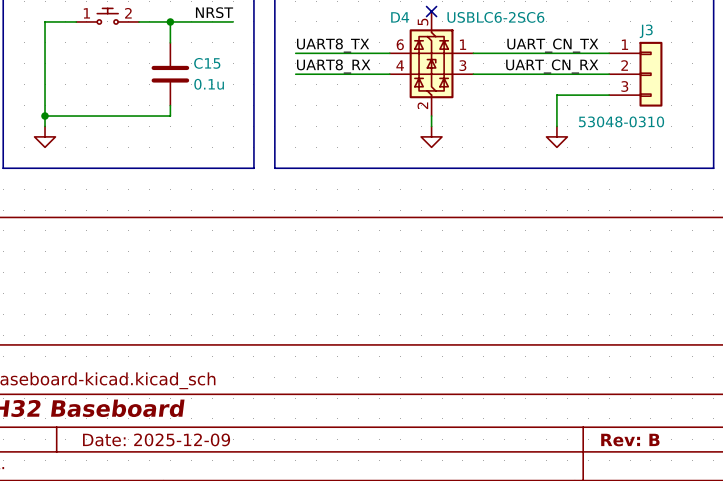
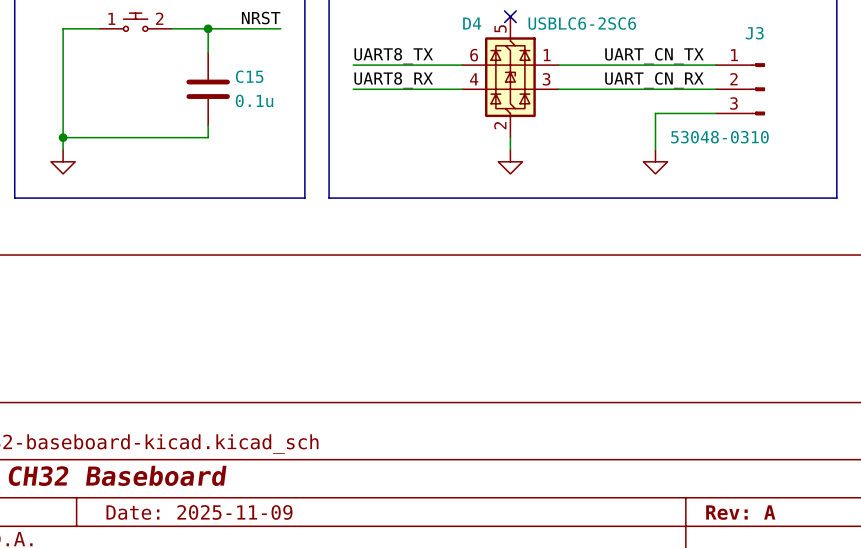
J3 symbol: [609, 41, 663, 107] -> [715, 63, 766, 116]
title block: Date: 2025-12-09 (156, 439) -> Date: 2025-11-09 (199, 512)
title block: Rev: B (630, 440) -> Rev: A (740, 512)

